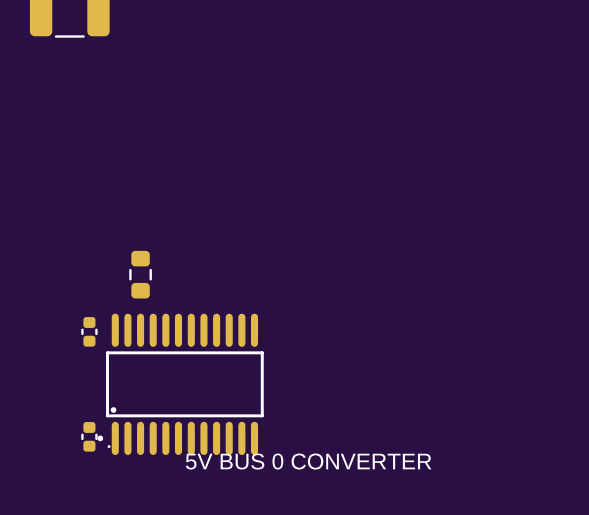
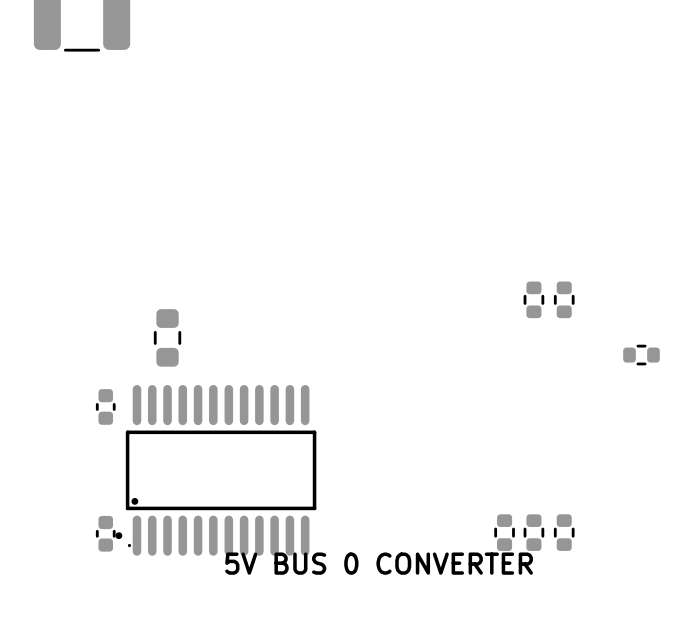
part: none -> (533, 299)
part: none -> (564, 299)
part: none -> (641, 355)
part: none -> (504, 532)
part: none -> (533, 532)
part: none -> (564, 532)

